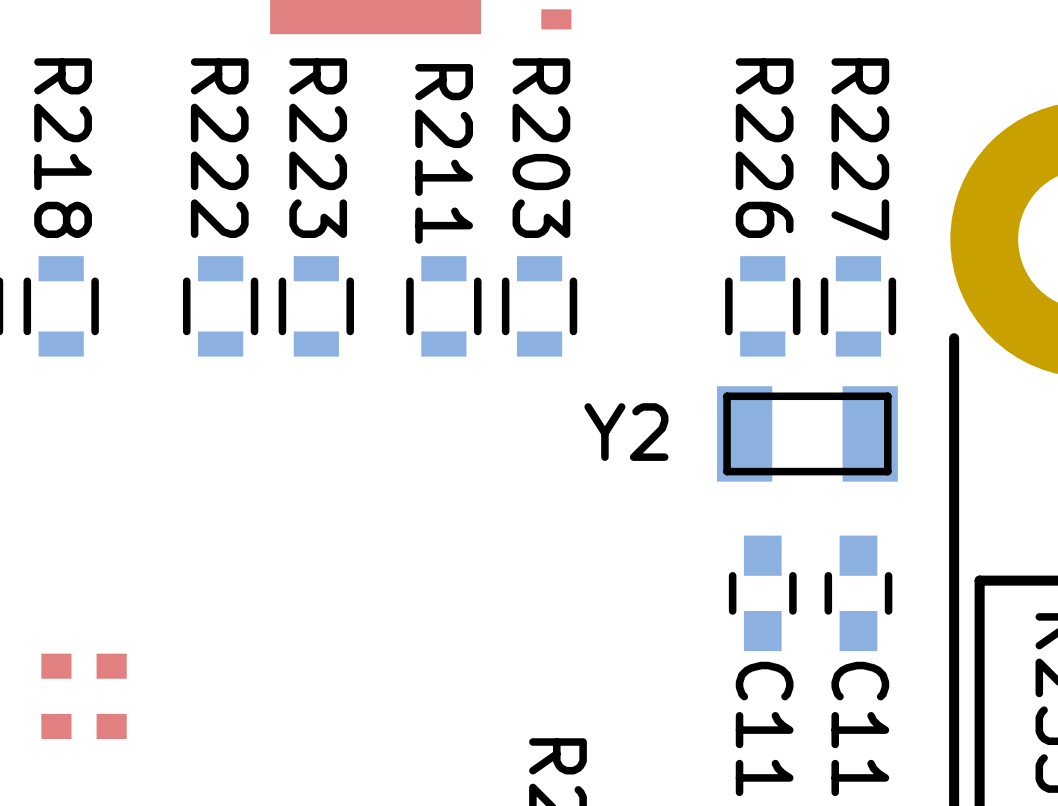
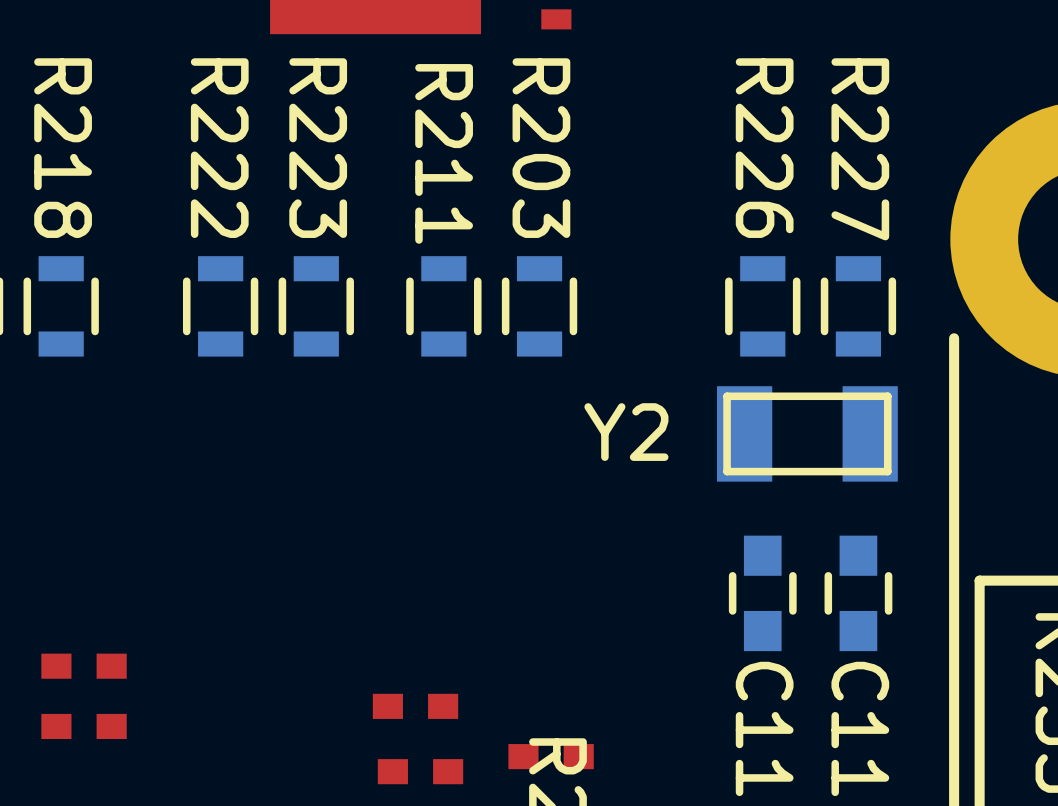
part: none -> (415, 706)
part: none -> (551, 756)
part: none -> (420, 771)

